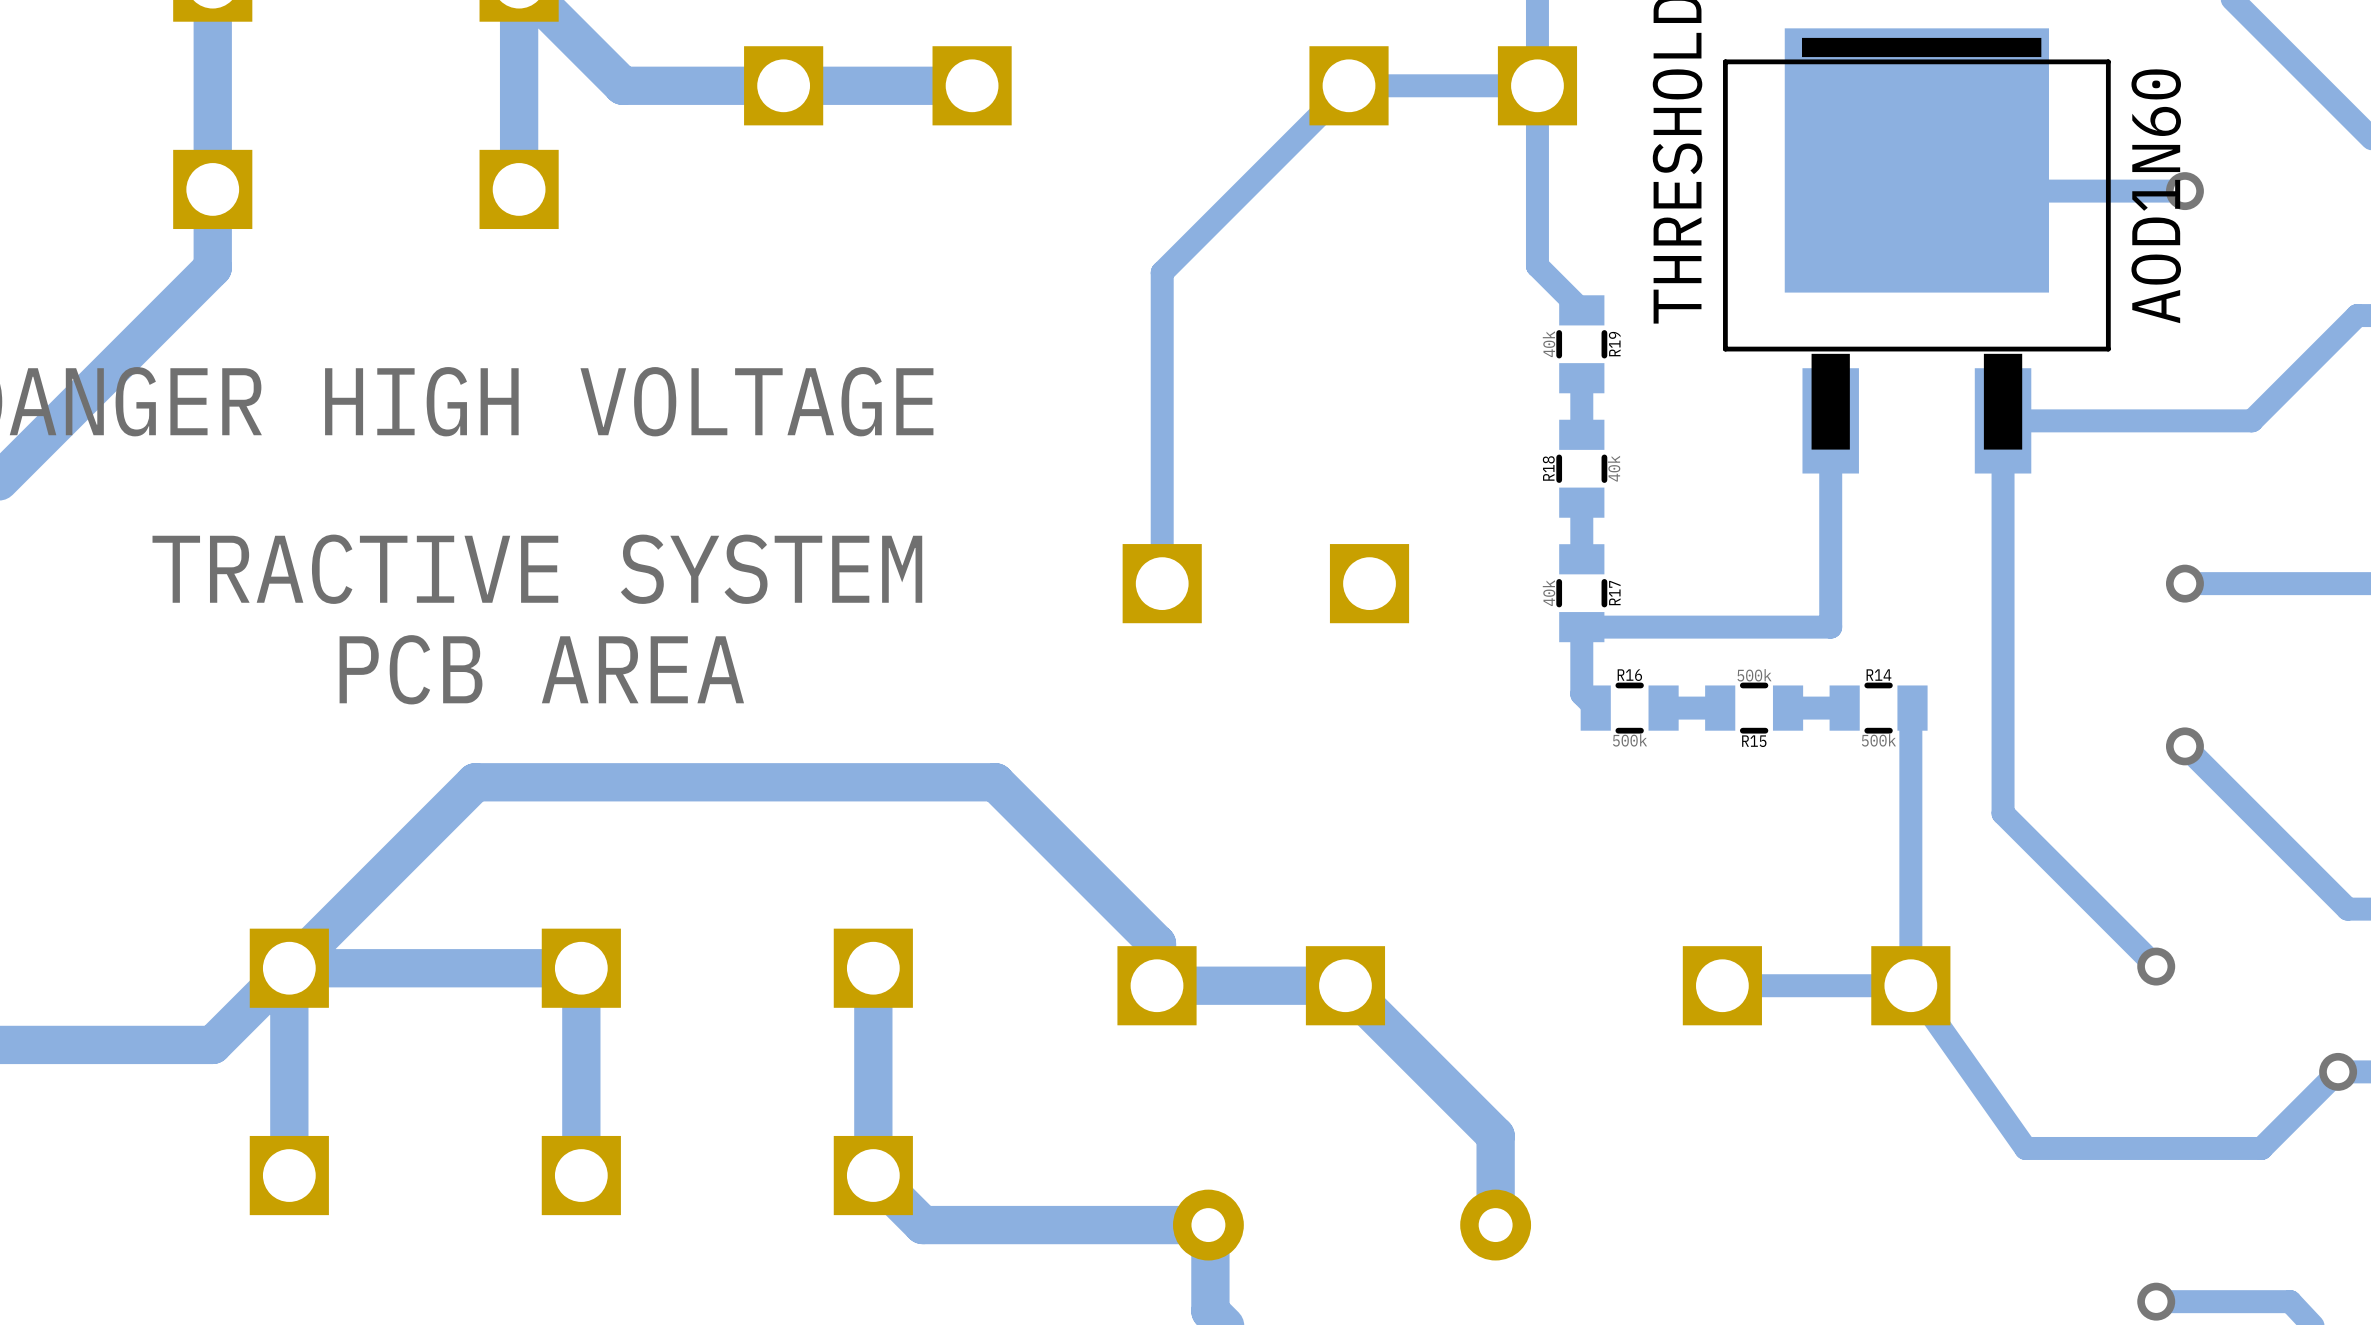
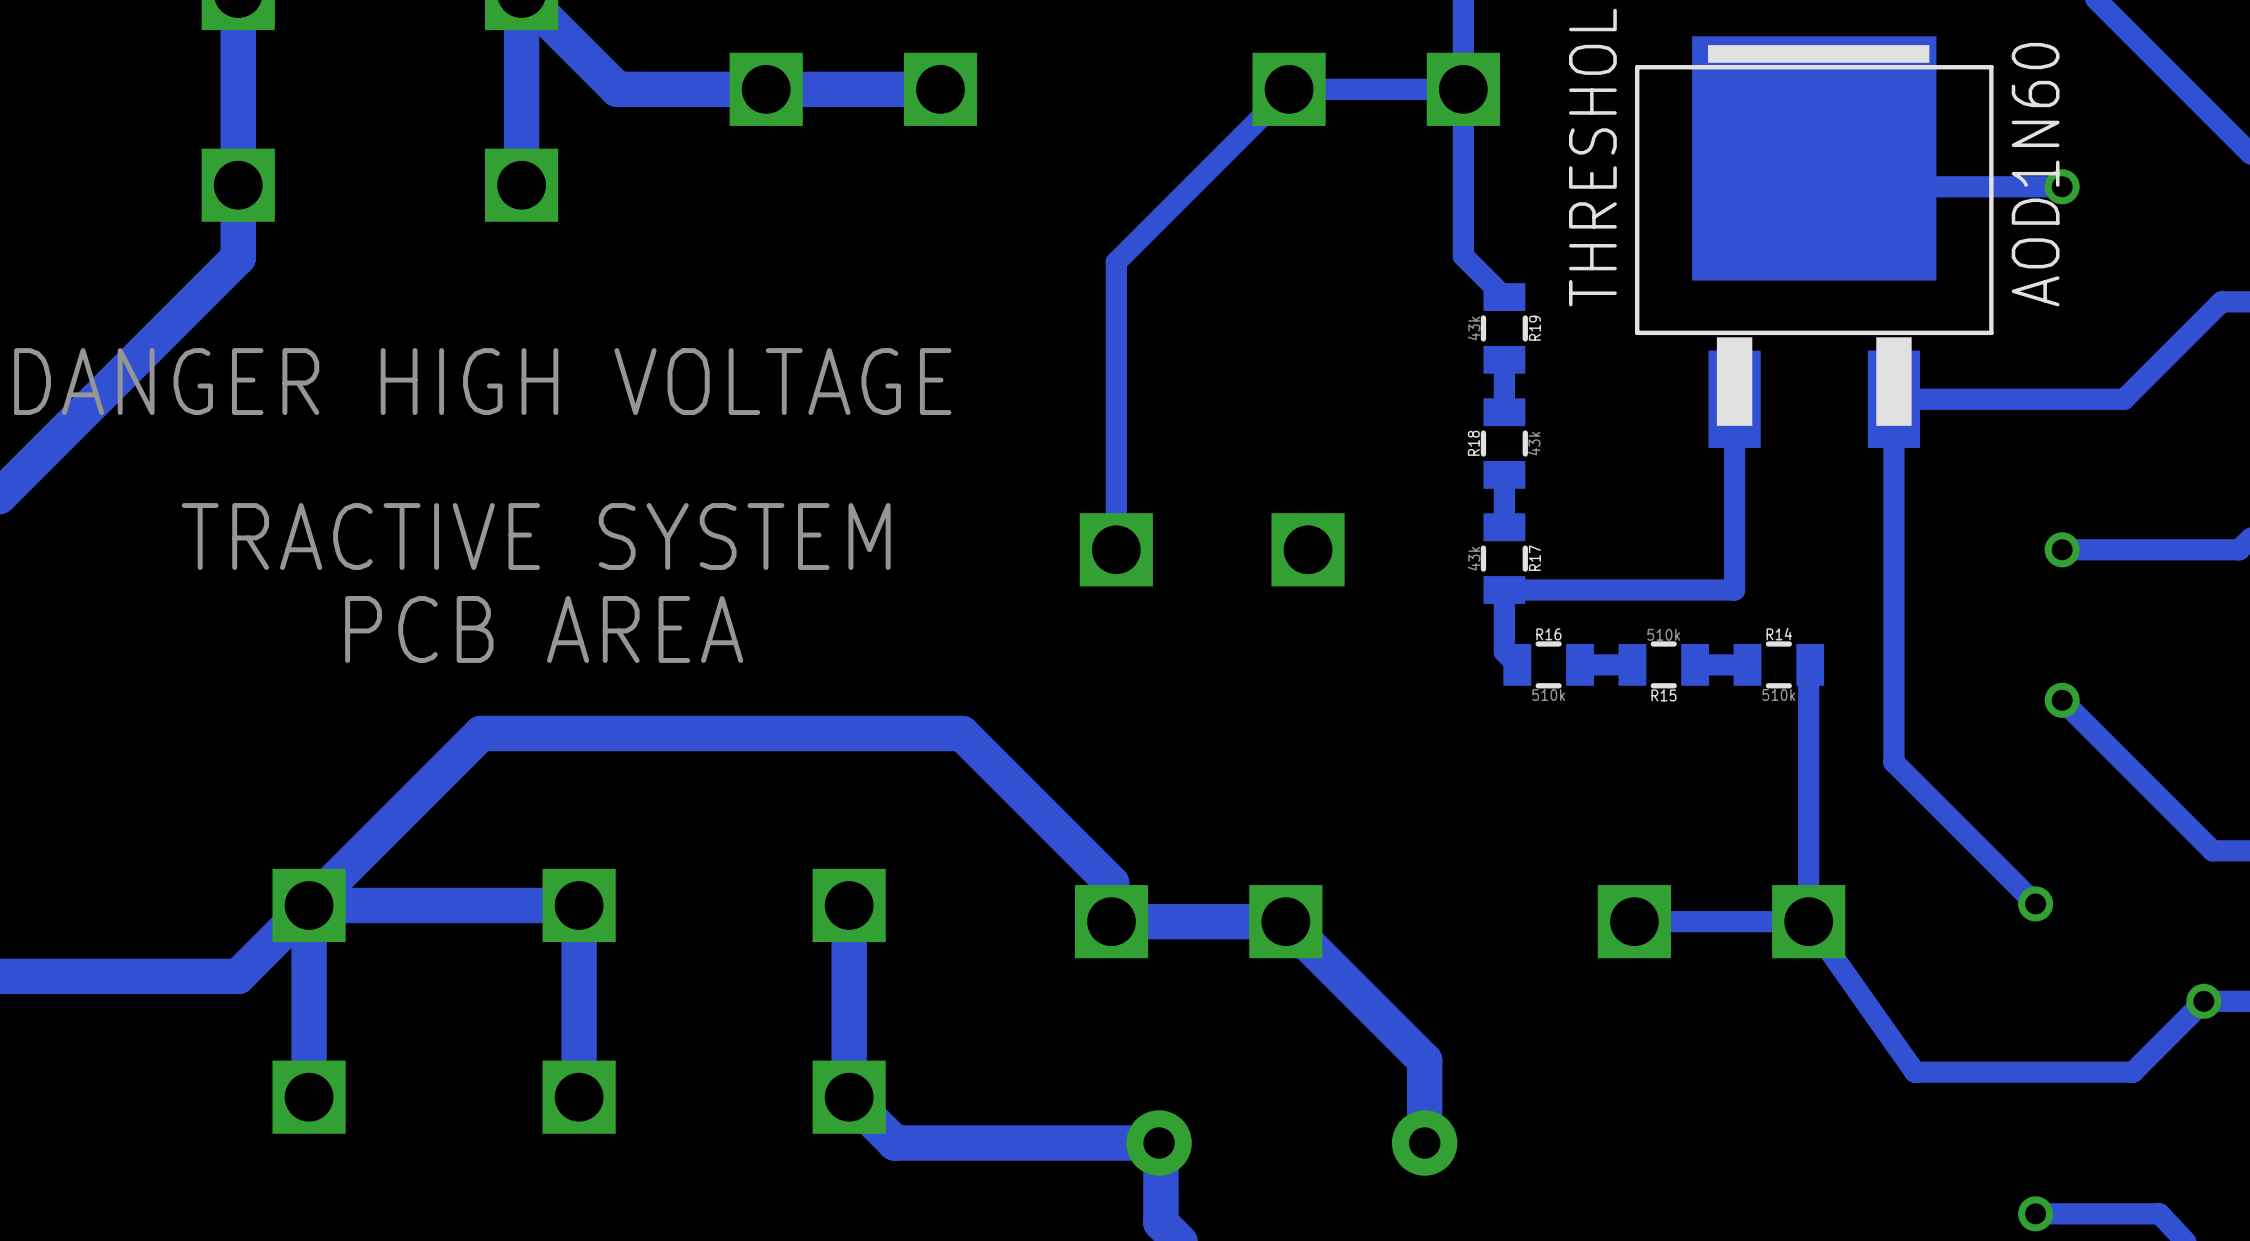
R19 value: 40k (1549, 344) -> 43k (1474, 328)
R18 value: 40k (1614, 468) -> 43k (1534, 443)
R17 value: 40k (1549, 593) -> 43k (1474, 558)
R15 value: 500k (1754, 675) -> 510k (1663, 634)
R16 value: 500k (1630, 740) -> 510k (1548, 694)
R14 value: 500k (1878, 740) -> 510k (1778, 694)

